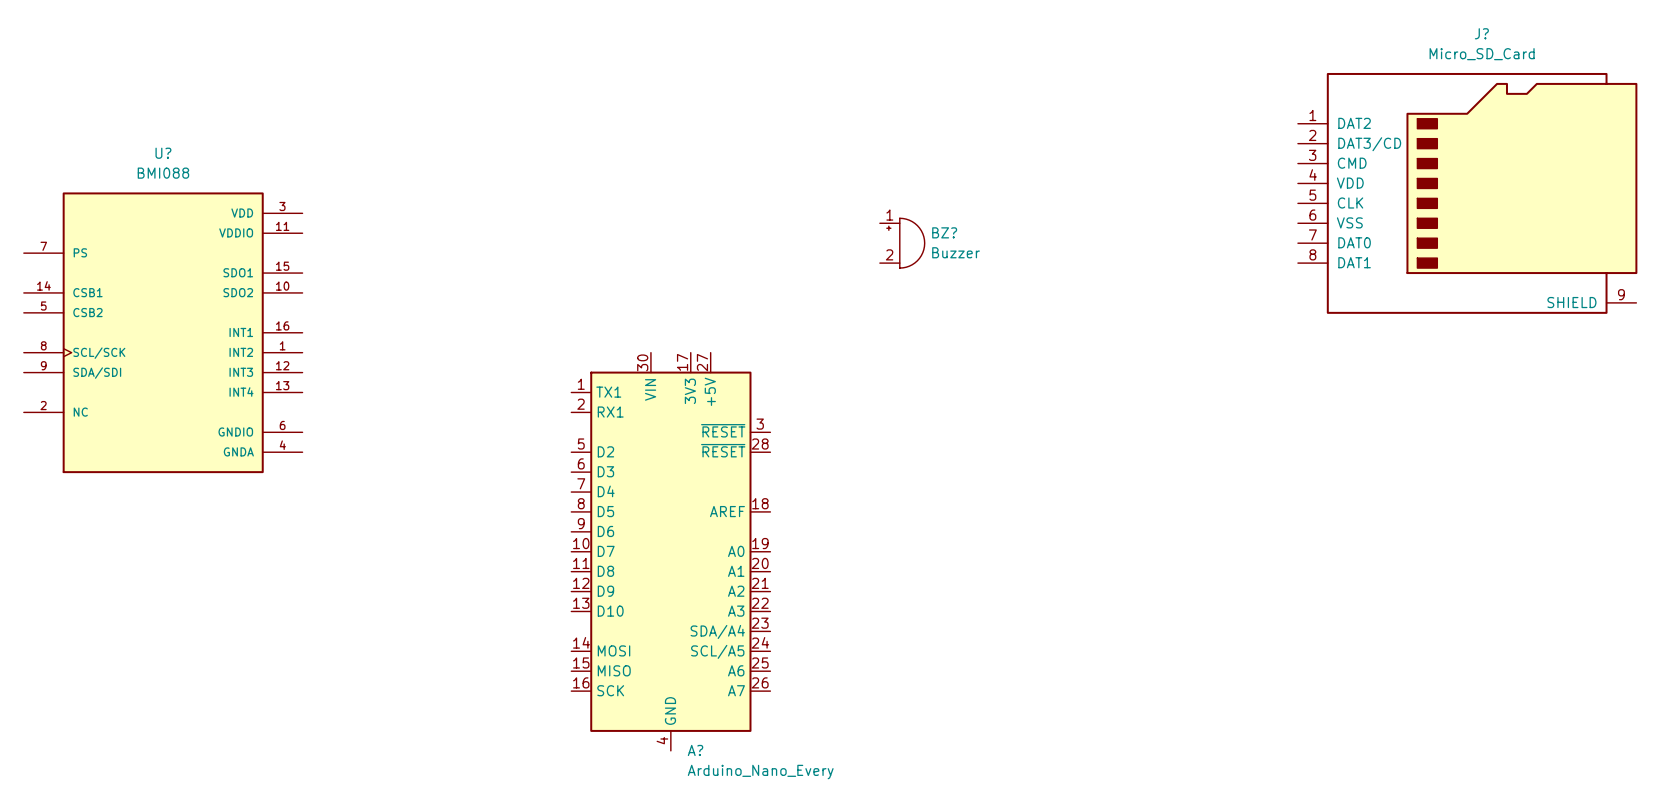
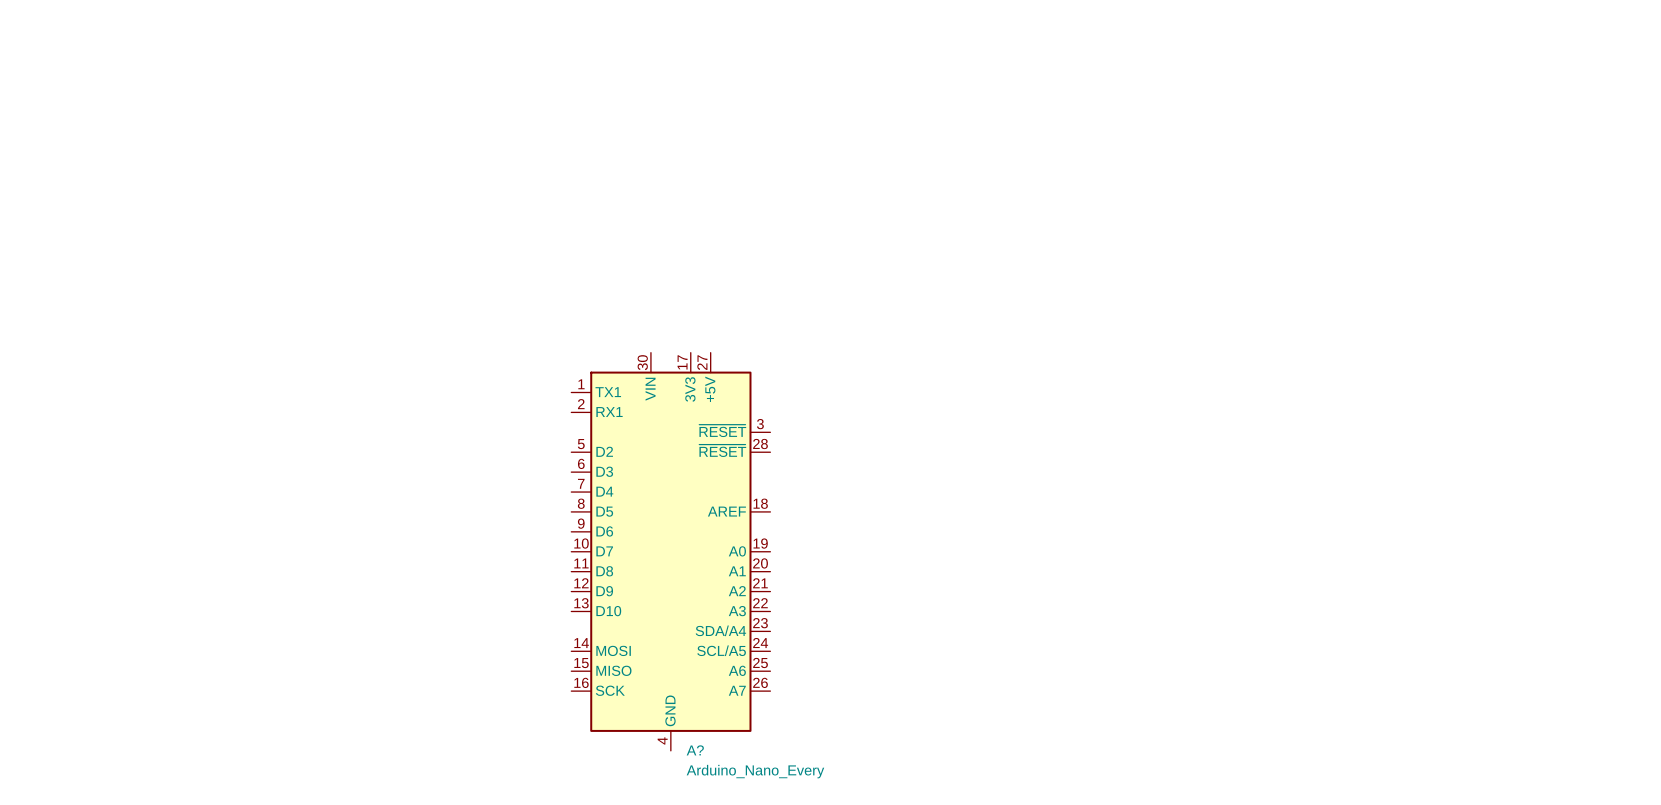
J?: Micro_SD_Card (1467, 193) -> none
BZ?: Buzzer (902, 243) -> none
U?: BMI088 (163, 332) -> none

